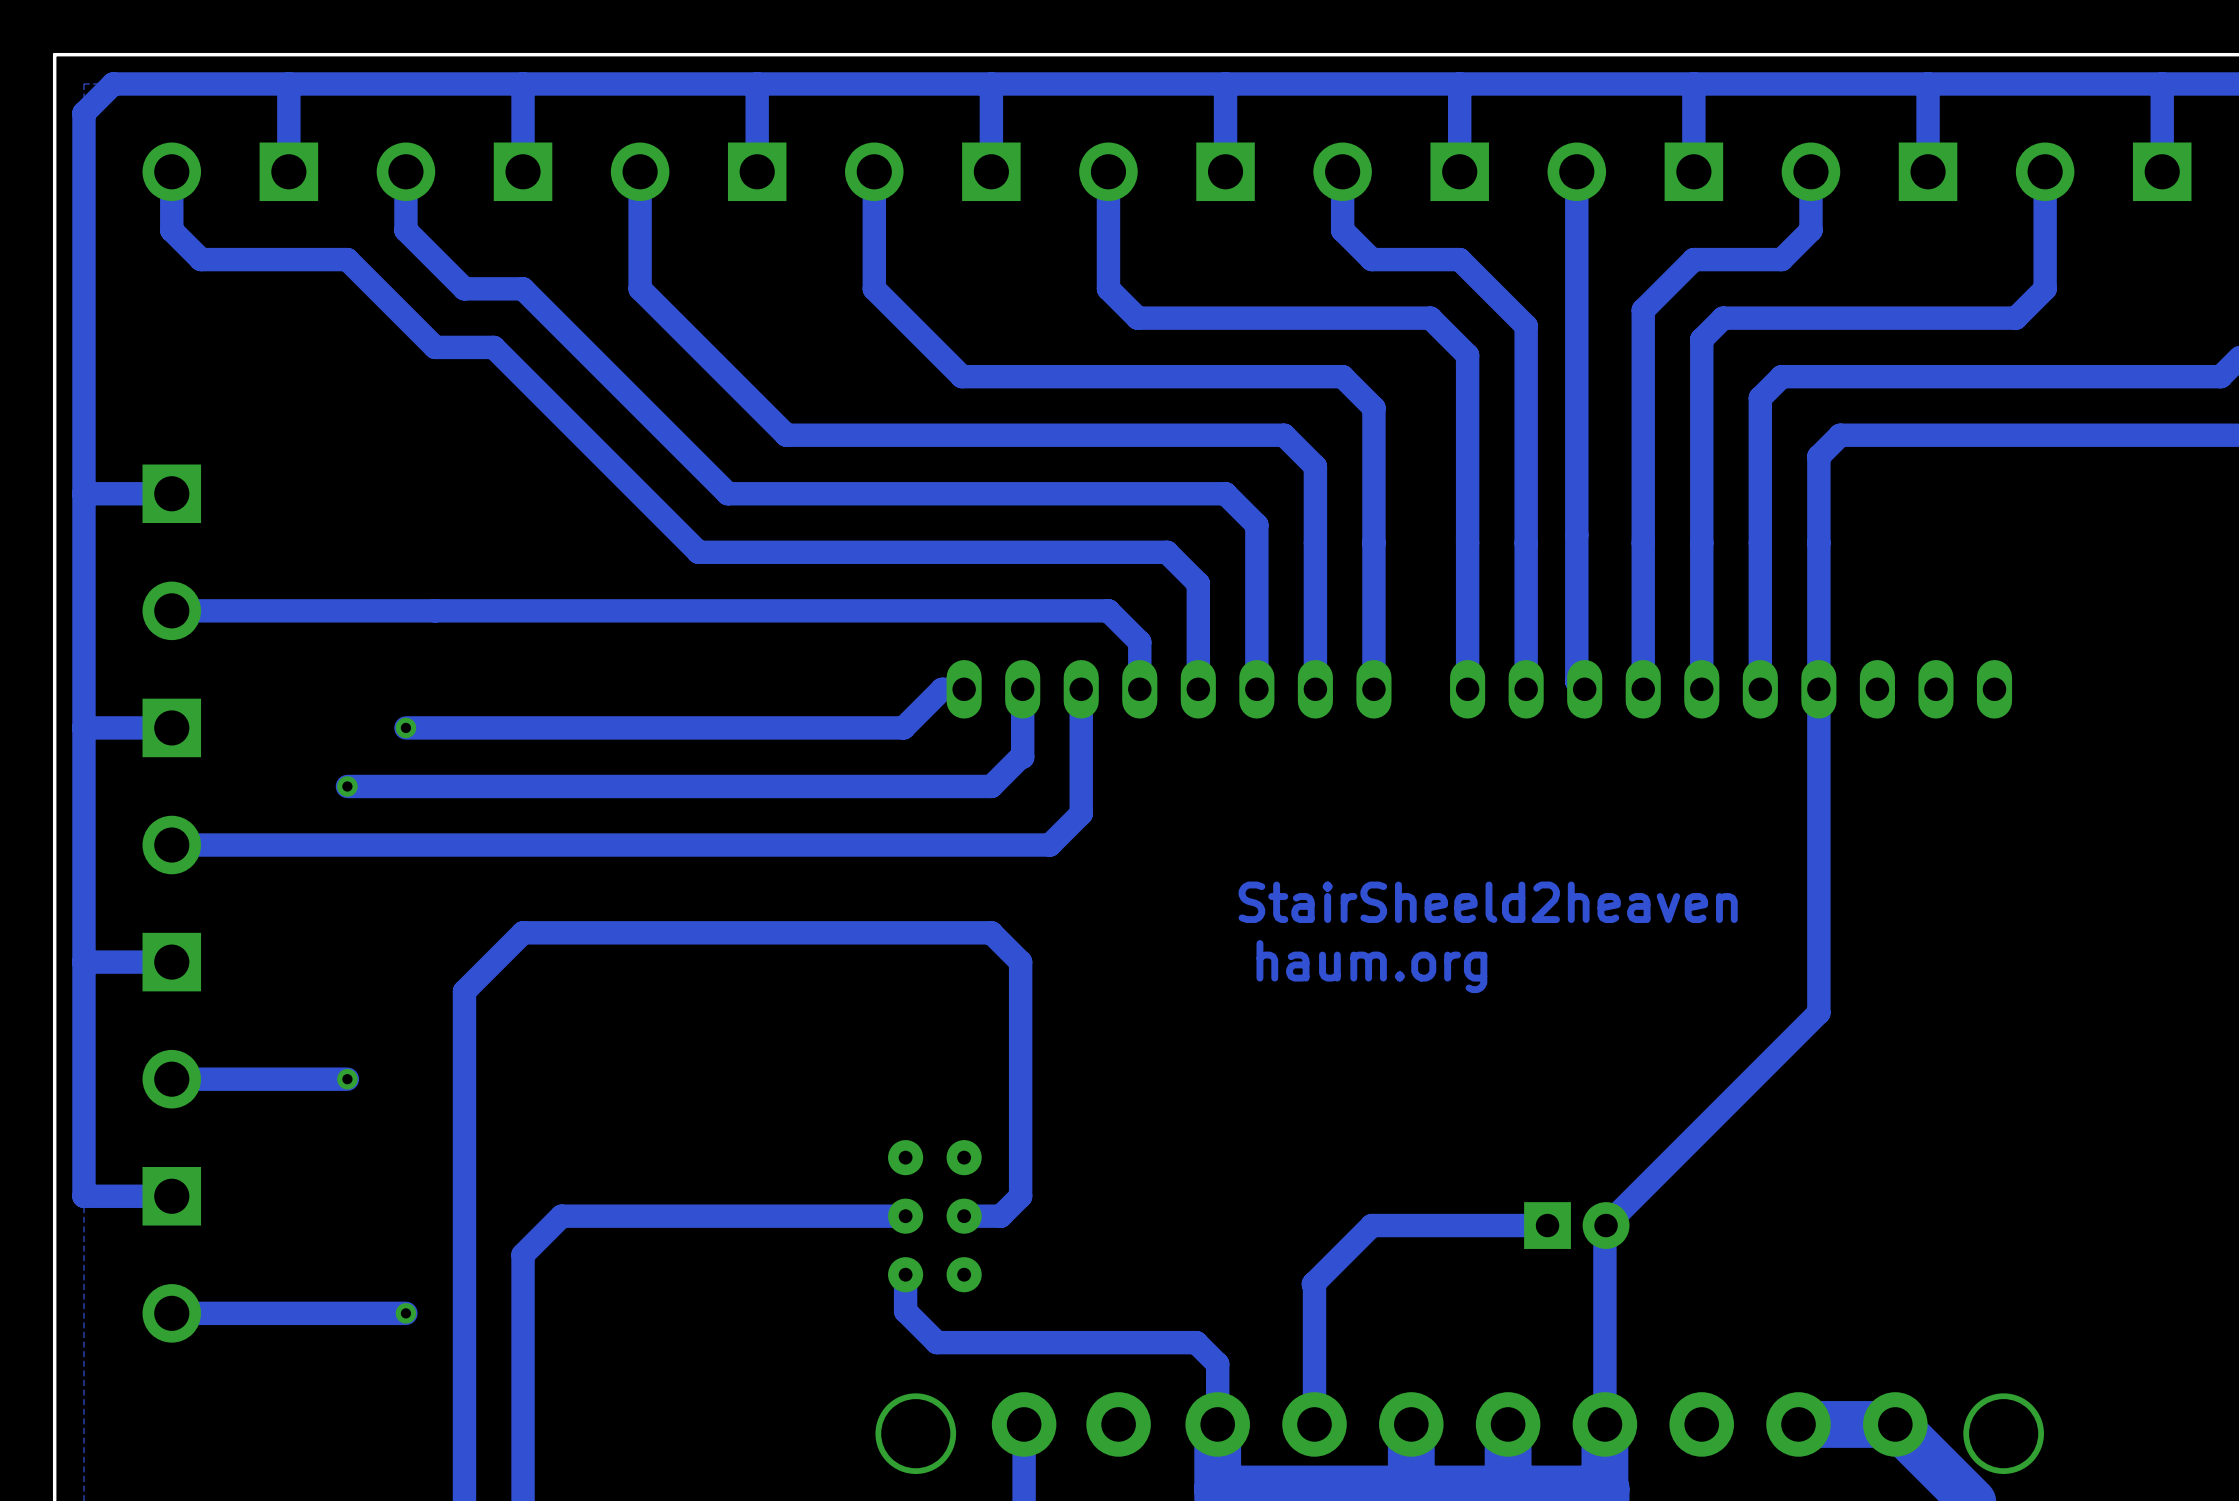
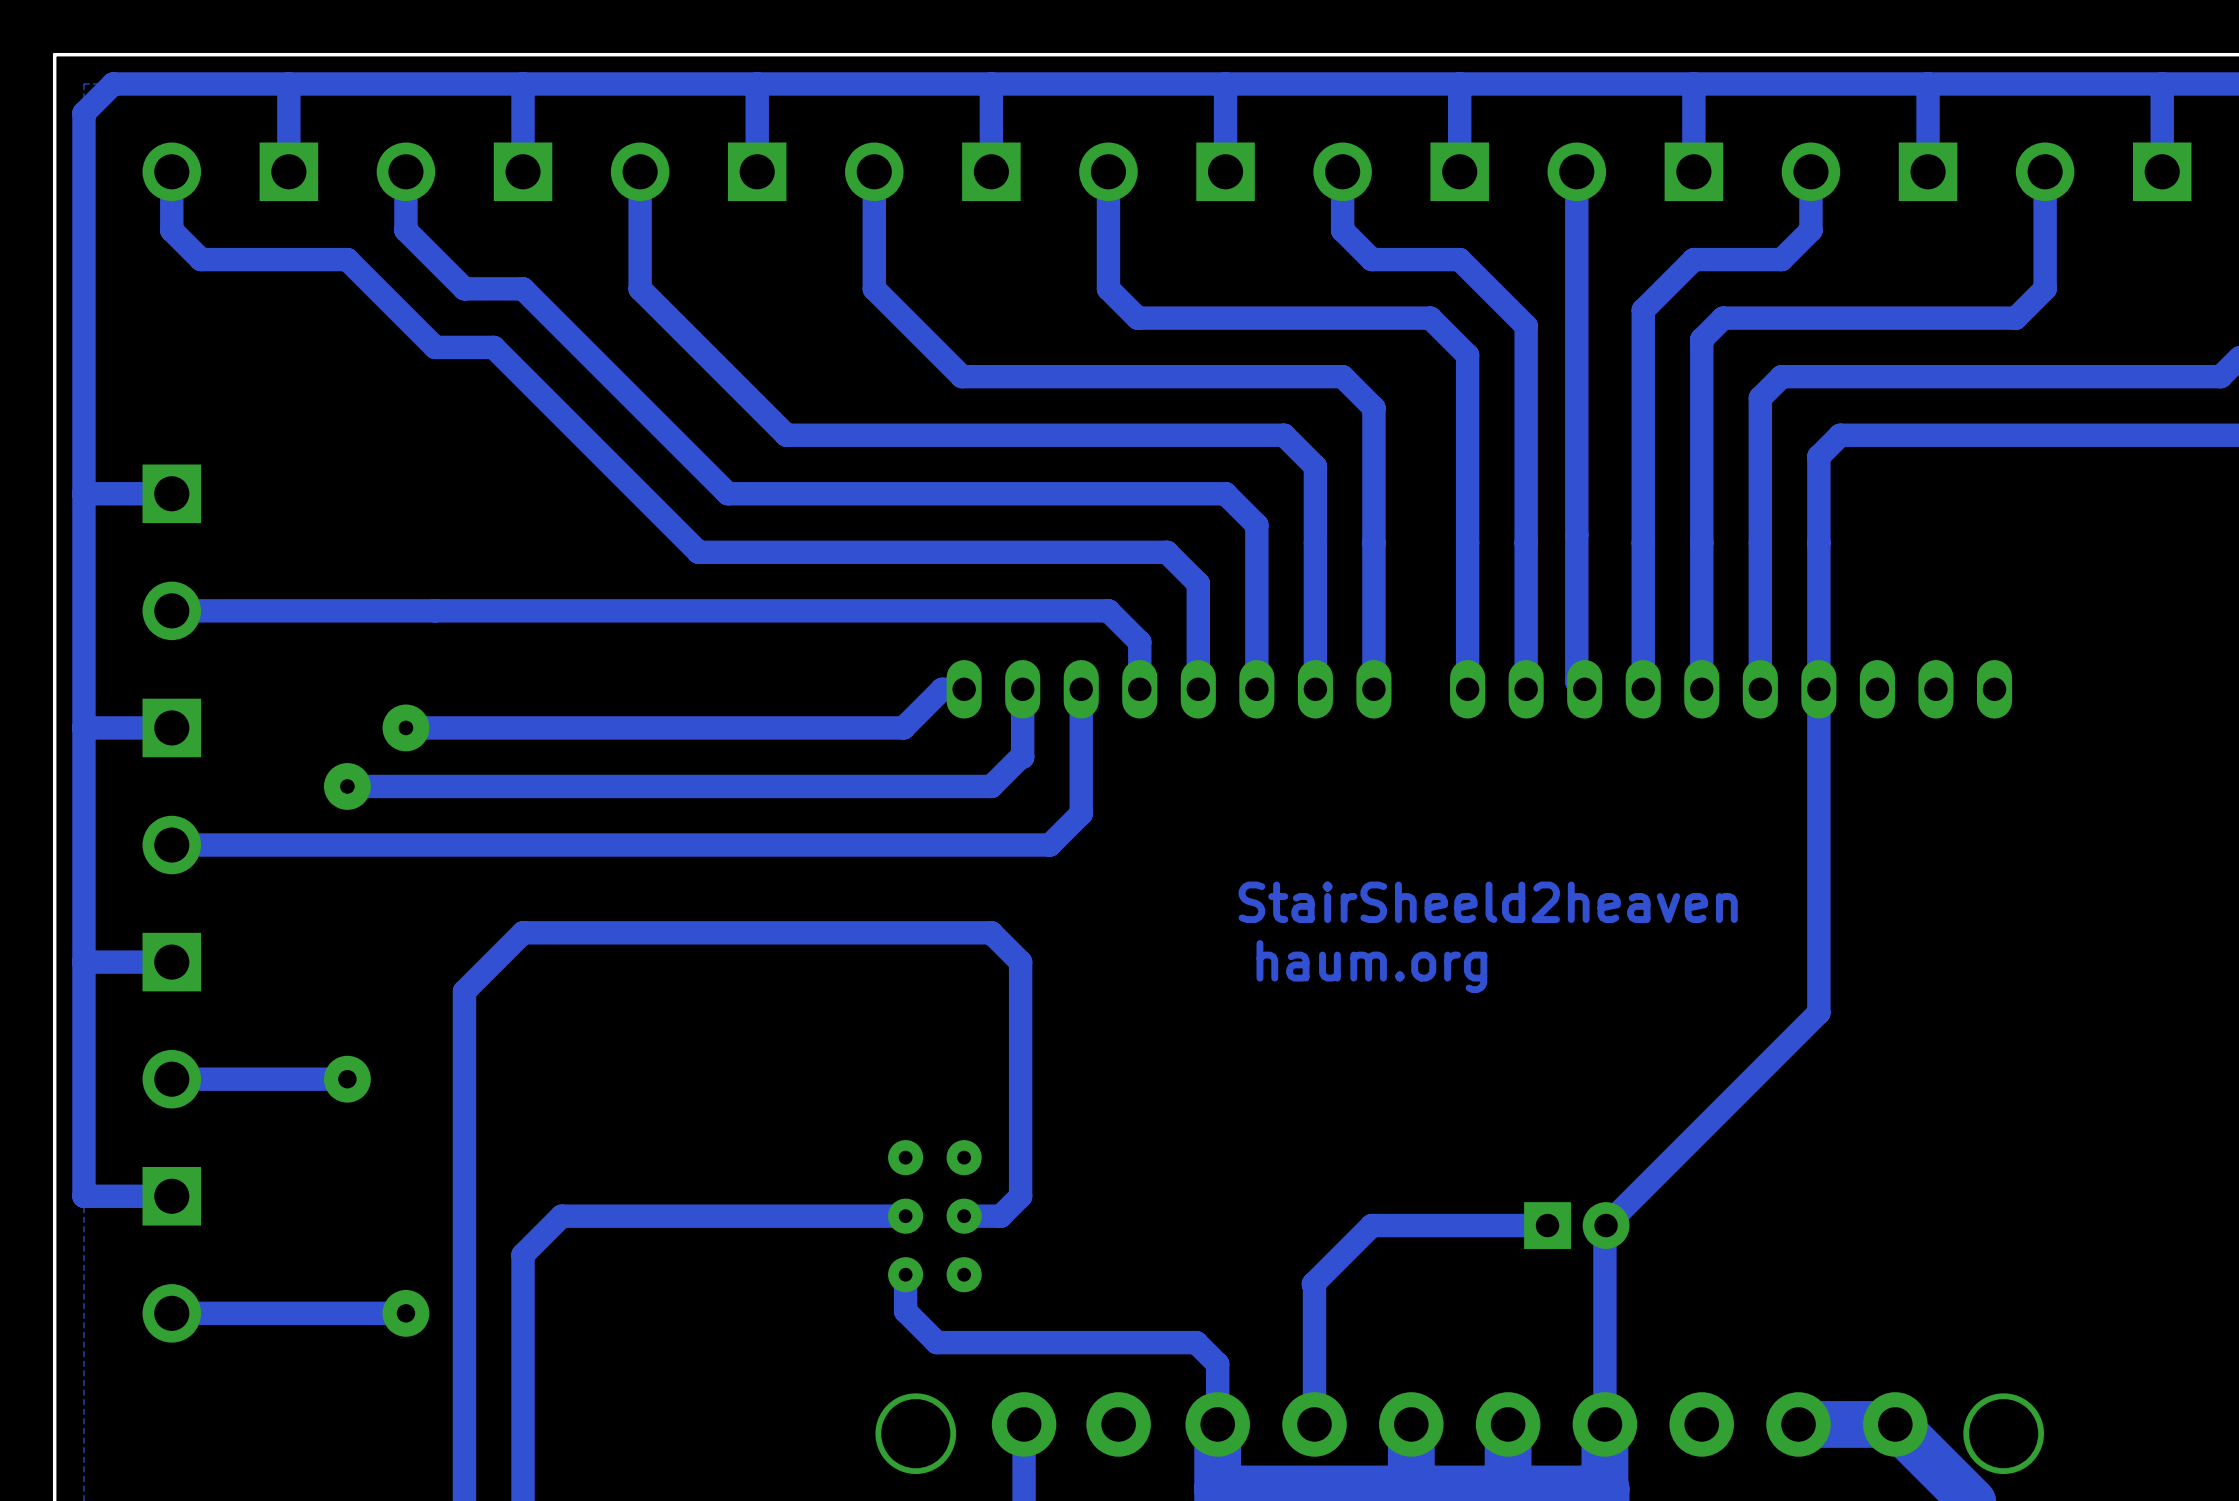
via size: [395, 717, 417, 739] -> [382, 704, 430, 752]
via size: [337, 776, 358, 797] -> [323, 763, 371, 810]
via size: [337, 1068, 358, 1090] -> [323, 1055, 371, 1103]
via size: [395, 1303, 417, 1324] -> [382, 1289, 430, 1337]

